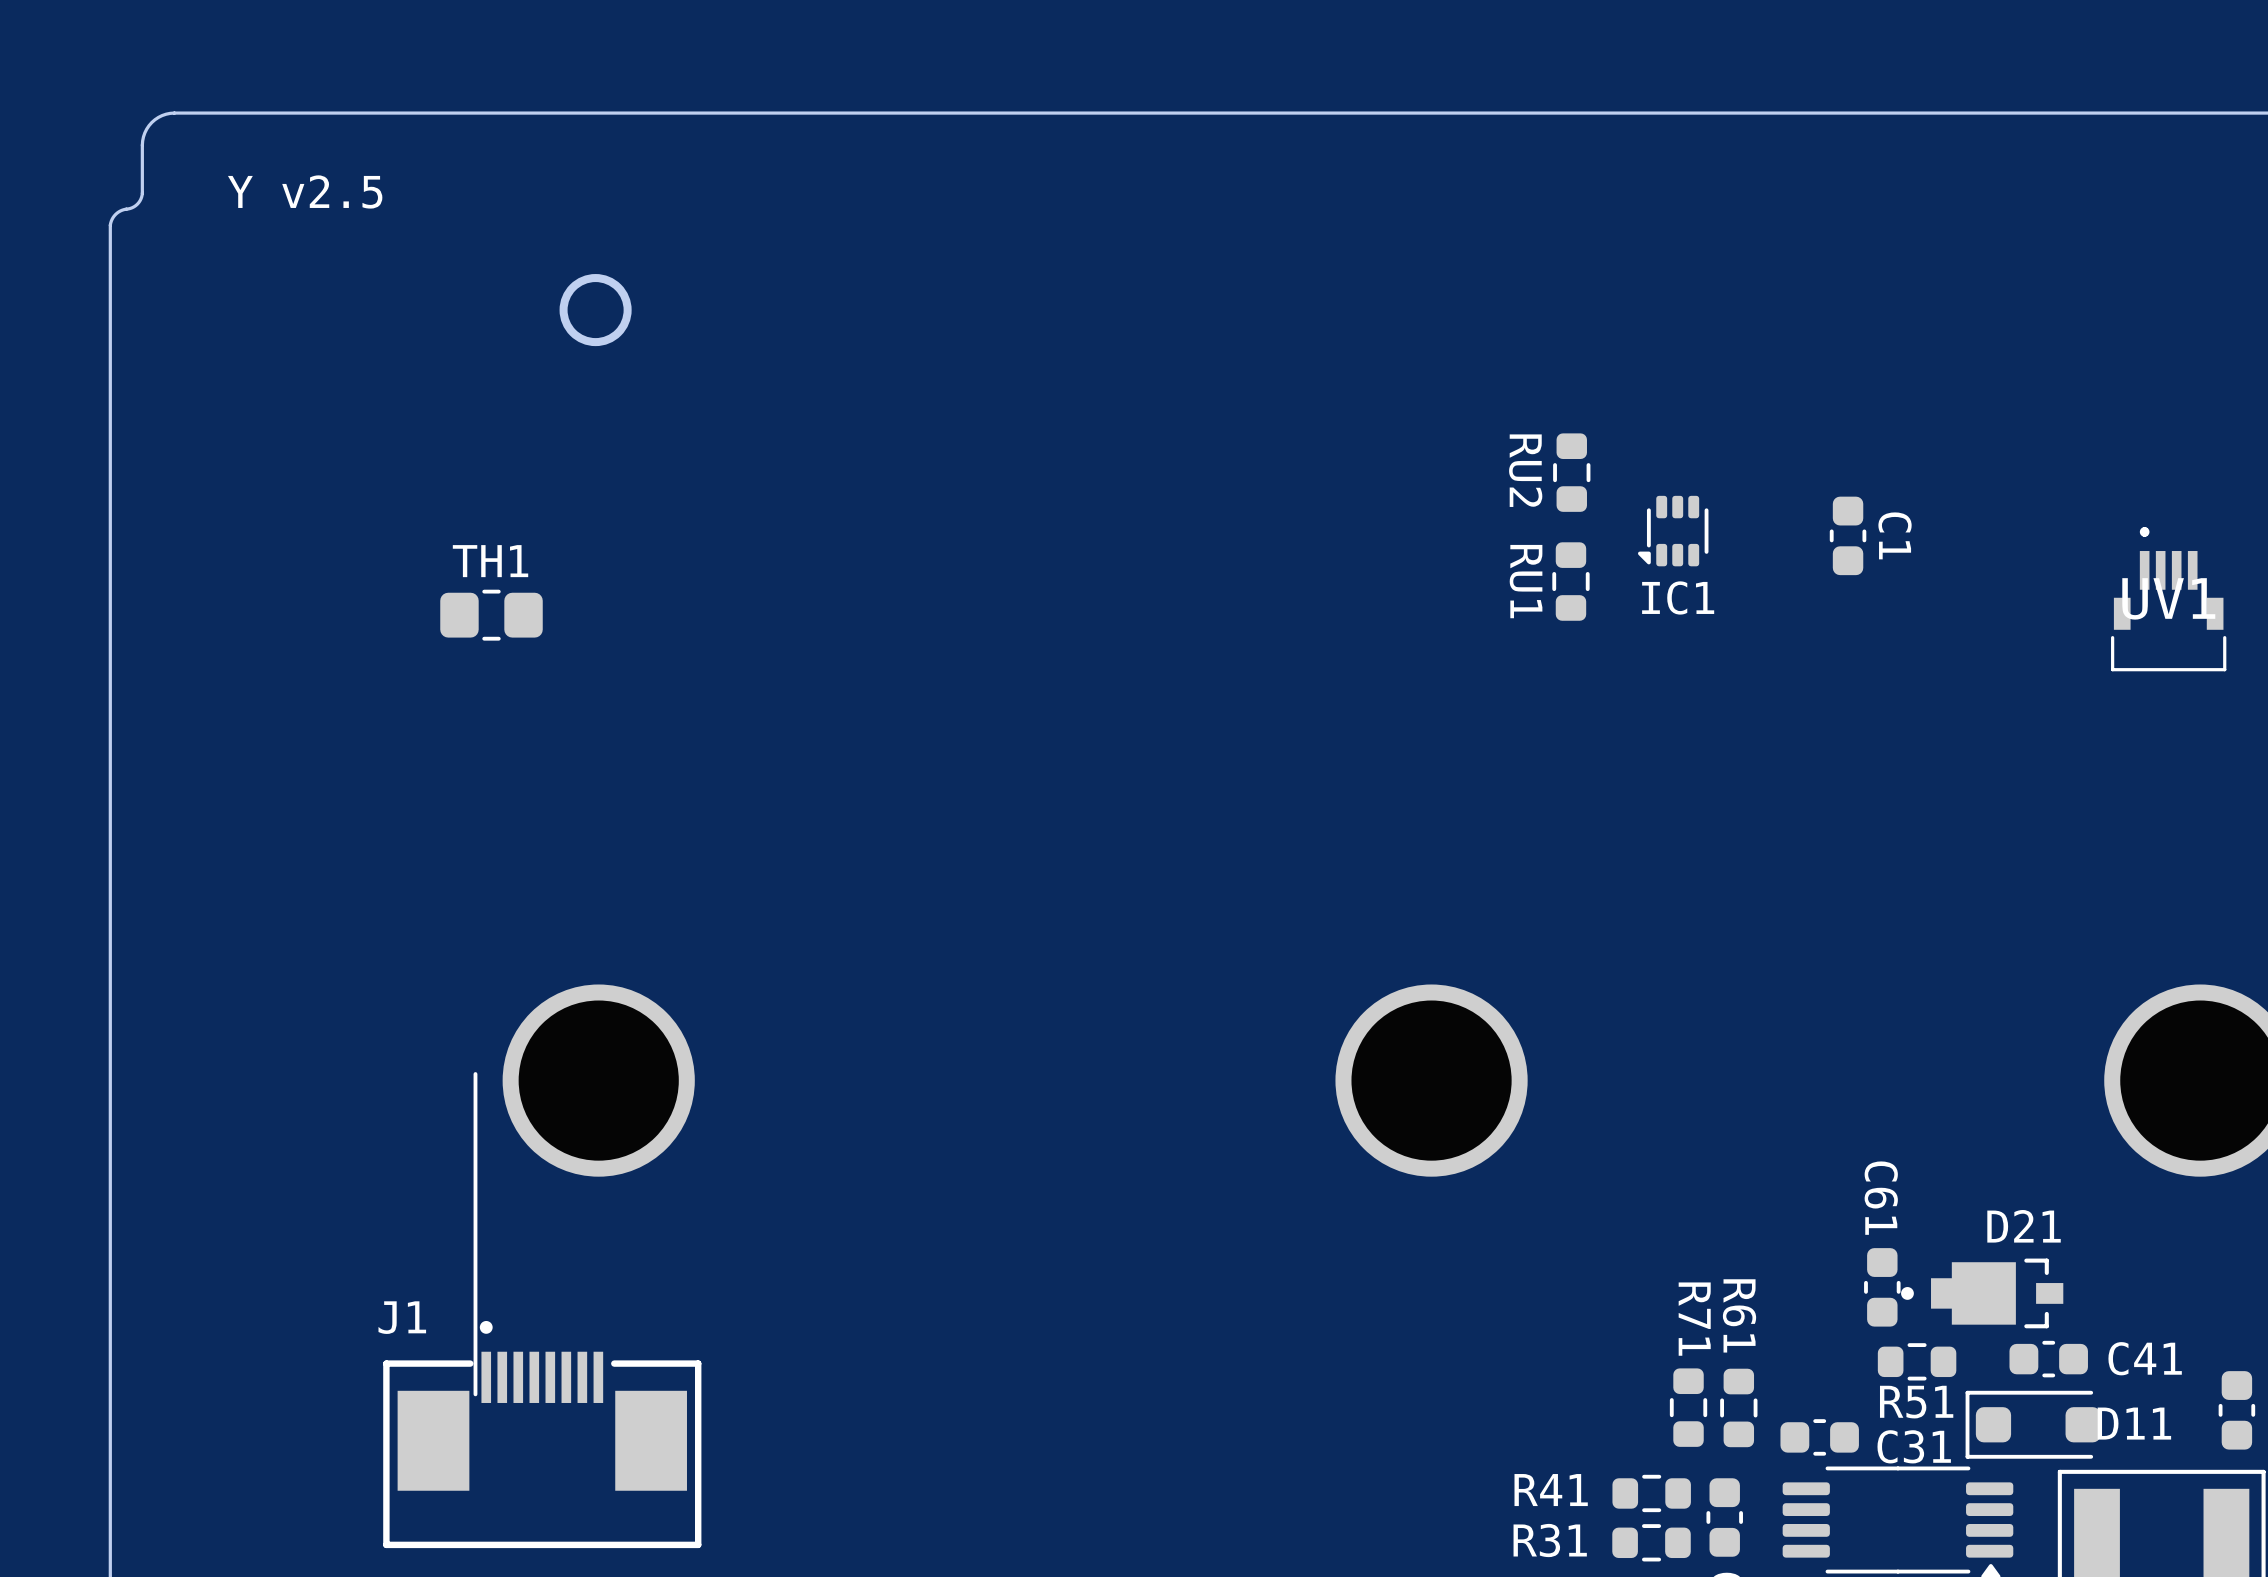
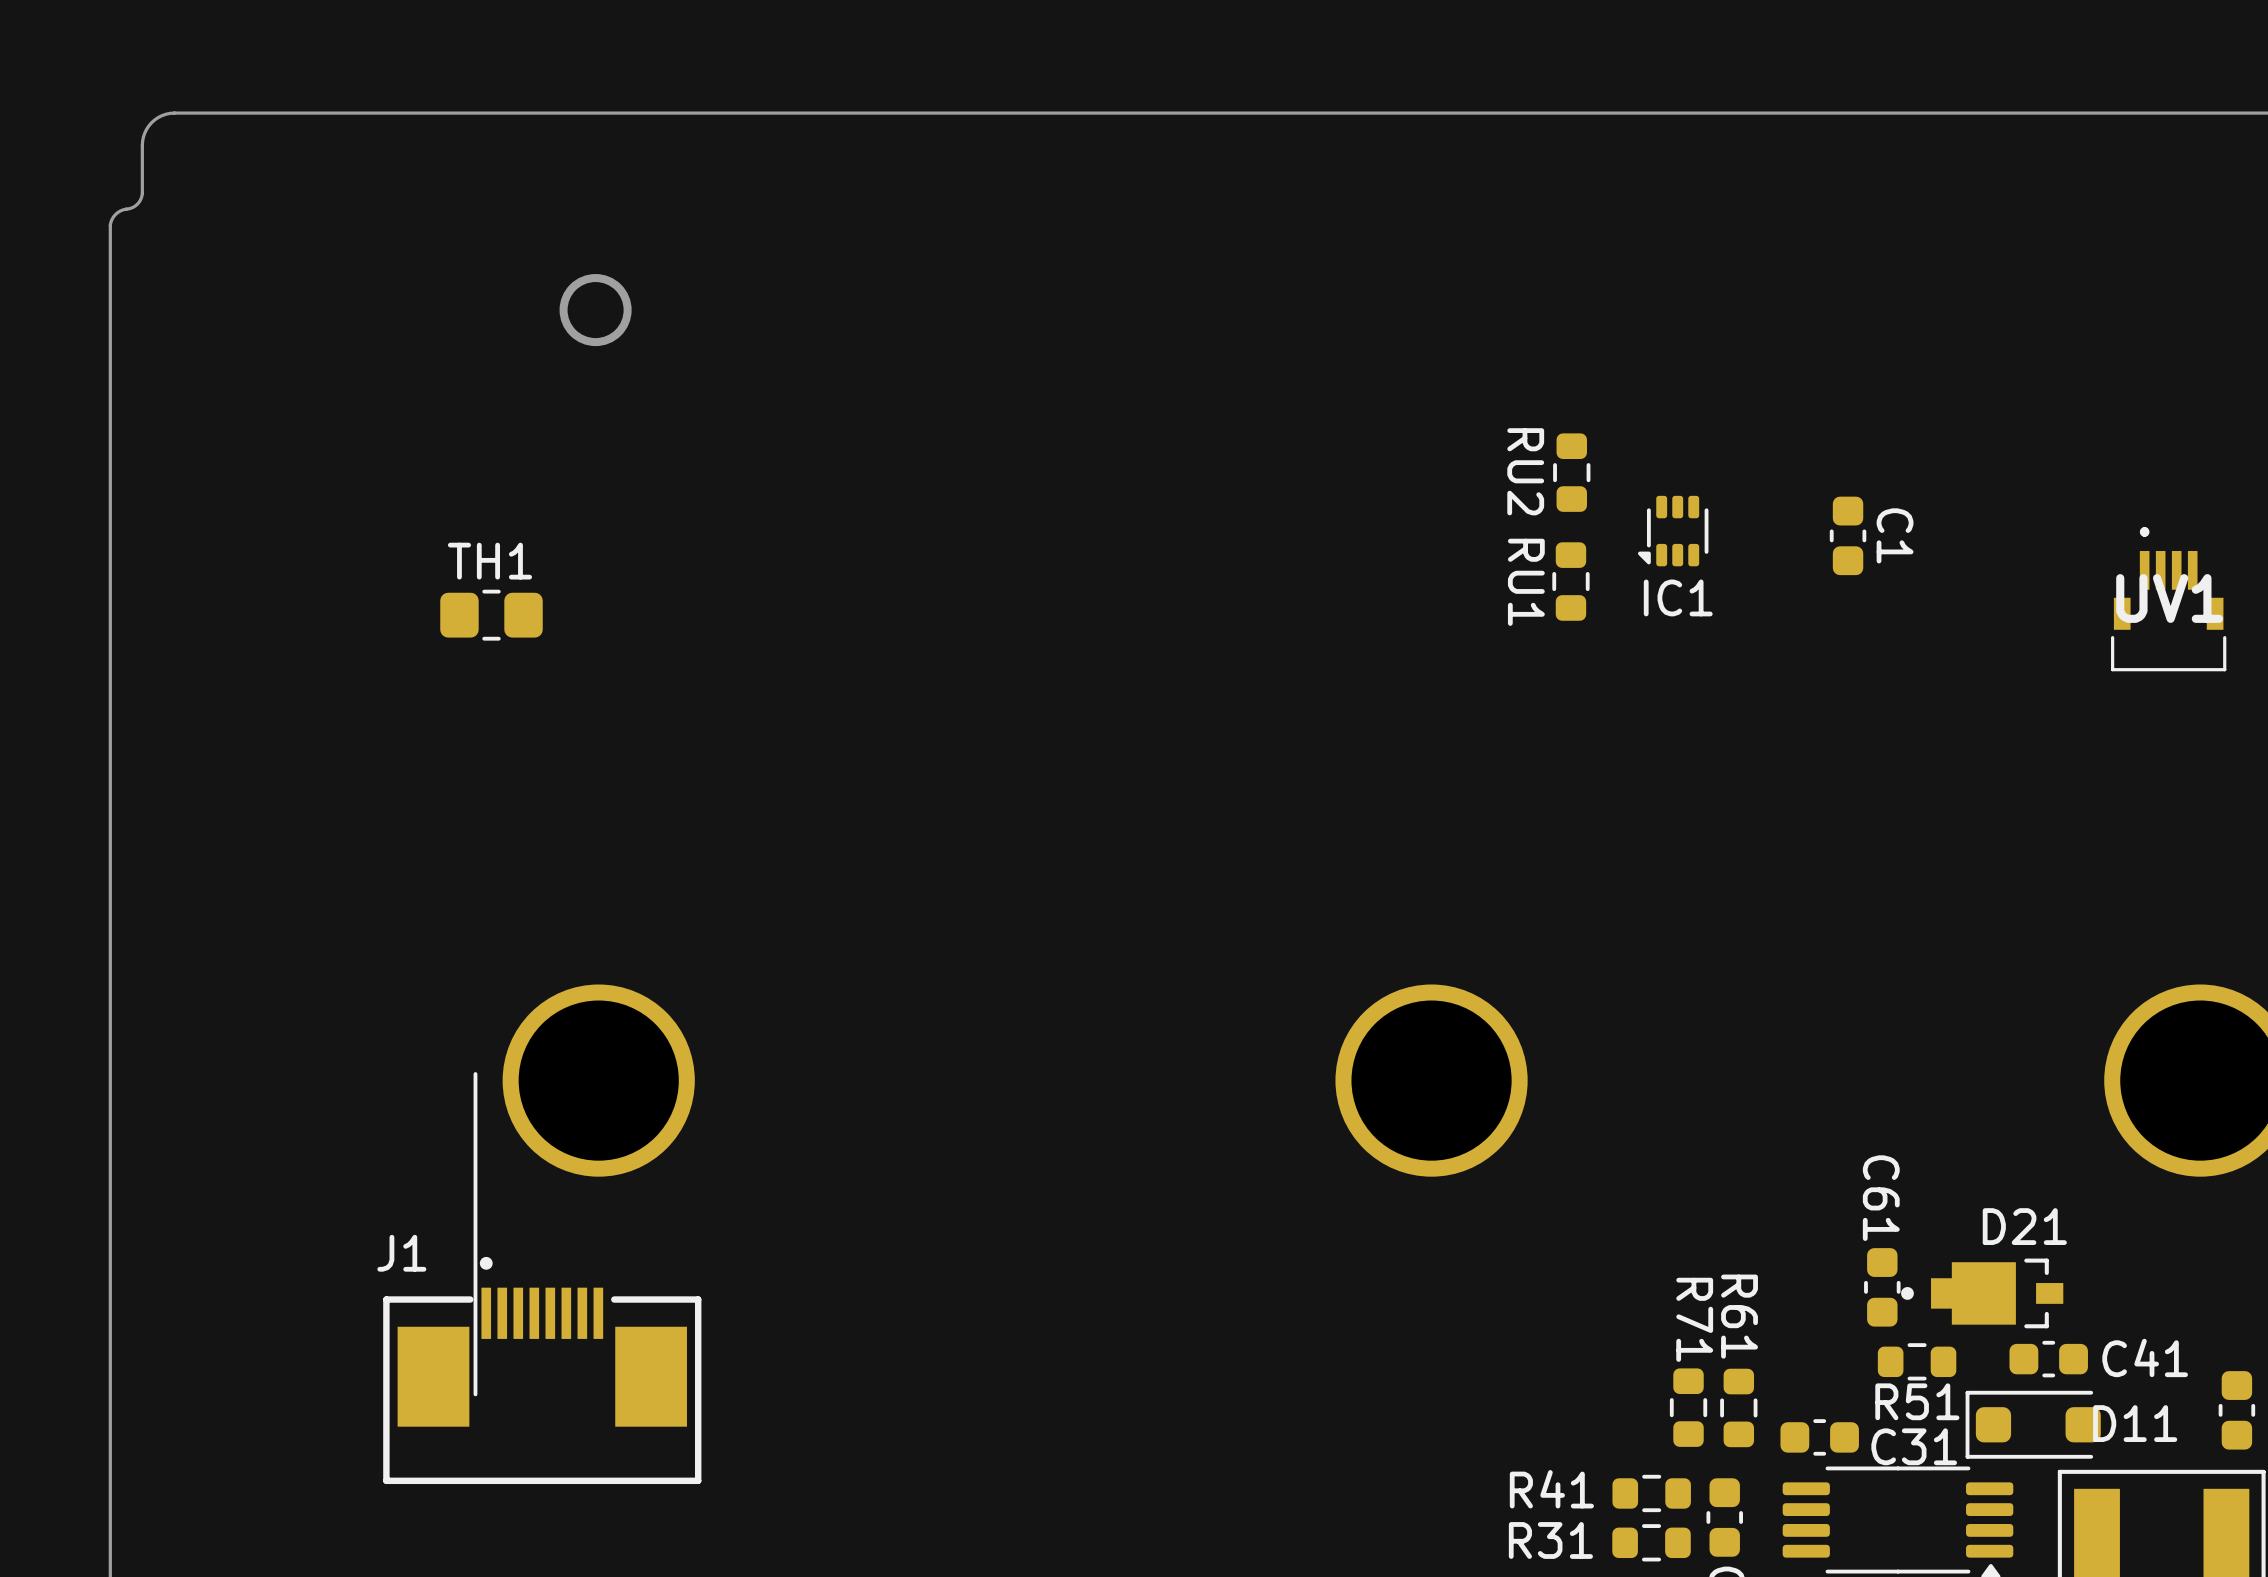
text: Y v2.5 (305, 191) -> none
J1 position: (542, 1434) -> (542, 1370)

